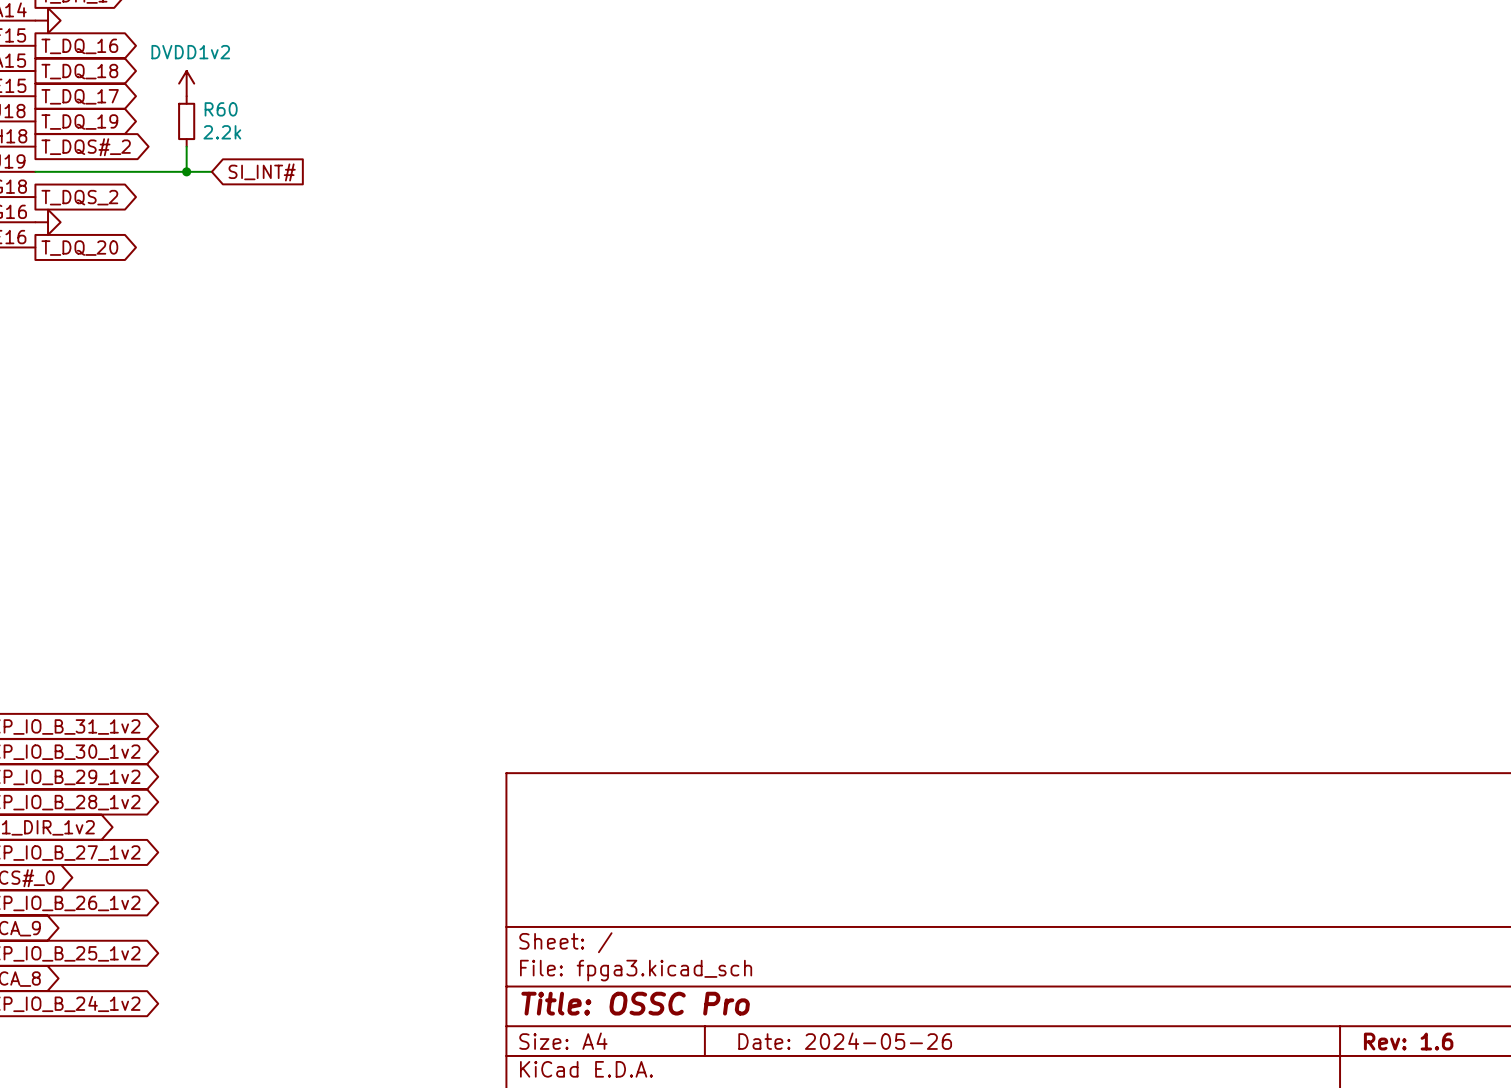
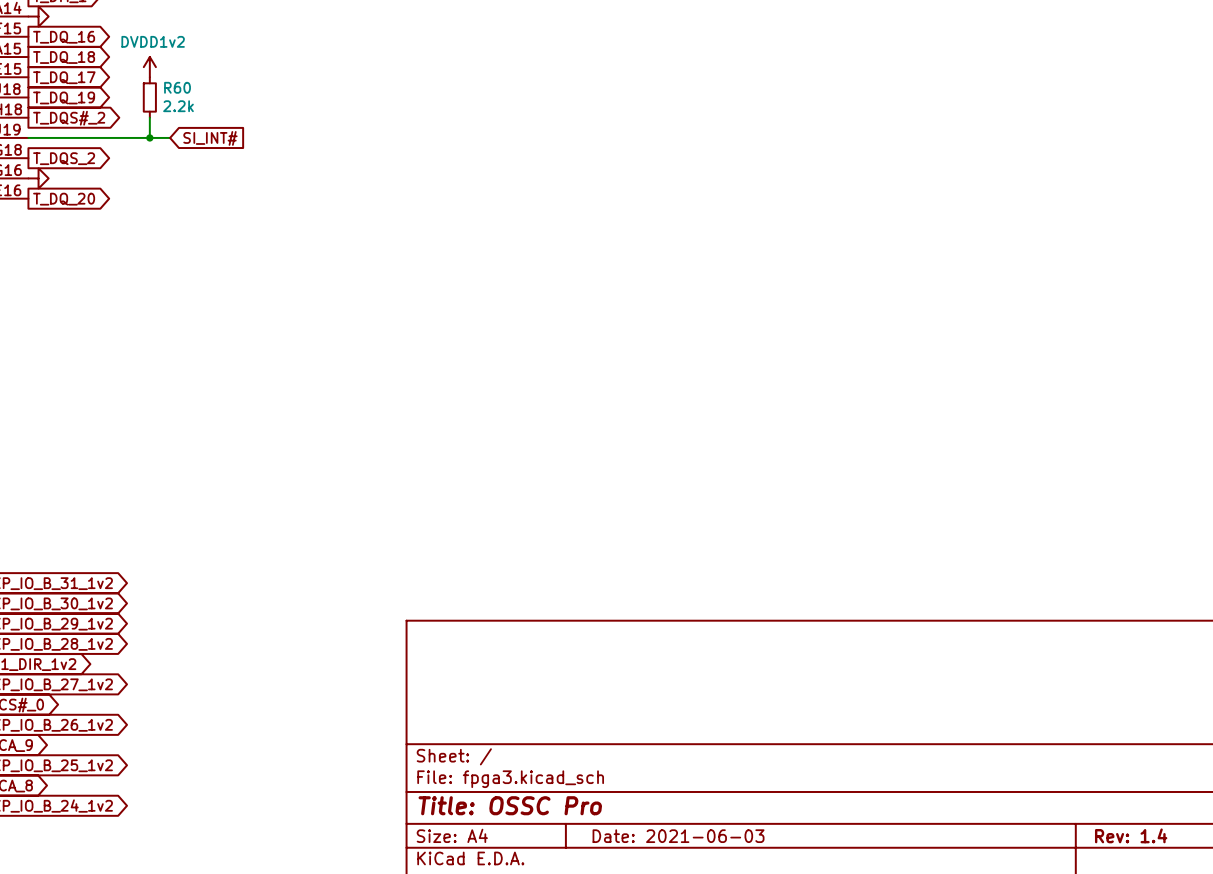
title block: Date: 2024-05-26 (845, 1041) -> Date: 2021-06-03 (678, 836)
title block: Rev: 1.6 (1408, 1041) -> Rev: 1.4 (1131, 835)

